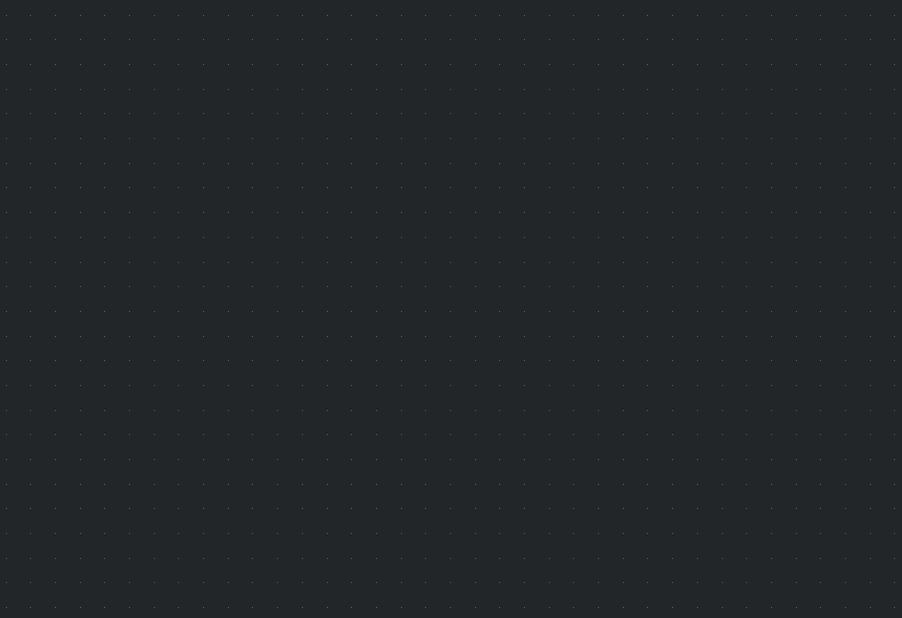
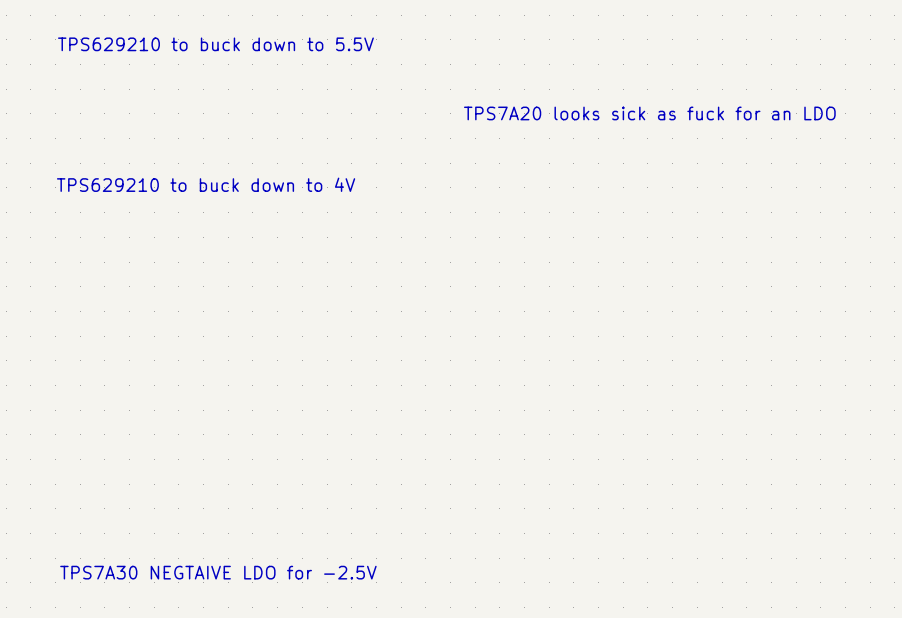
text: none -> TPS629210 to buck down to 5.5V (215, 44)
text: none -> TPS7A20 looks sick as fuck for an LDO (649, 113)
text: none -> TPS629210 to buck down to 4V (206, 184)
text: none -> TPS7A30 NEGTAIVE LDO for -2.5V (218, 572)

